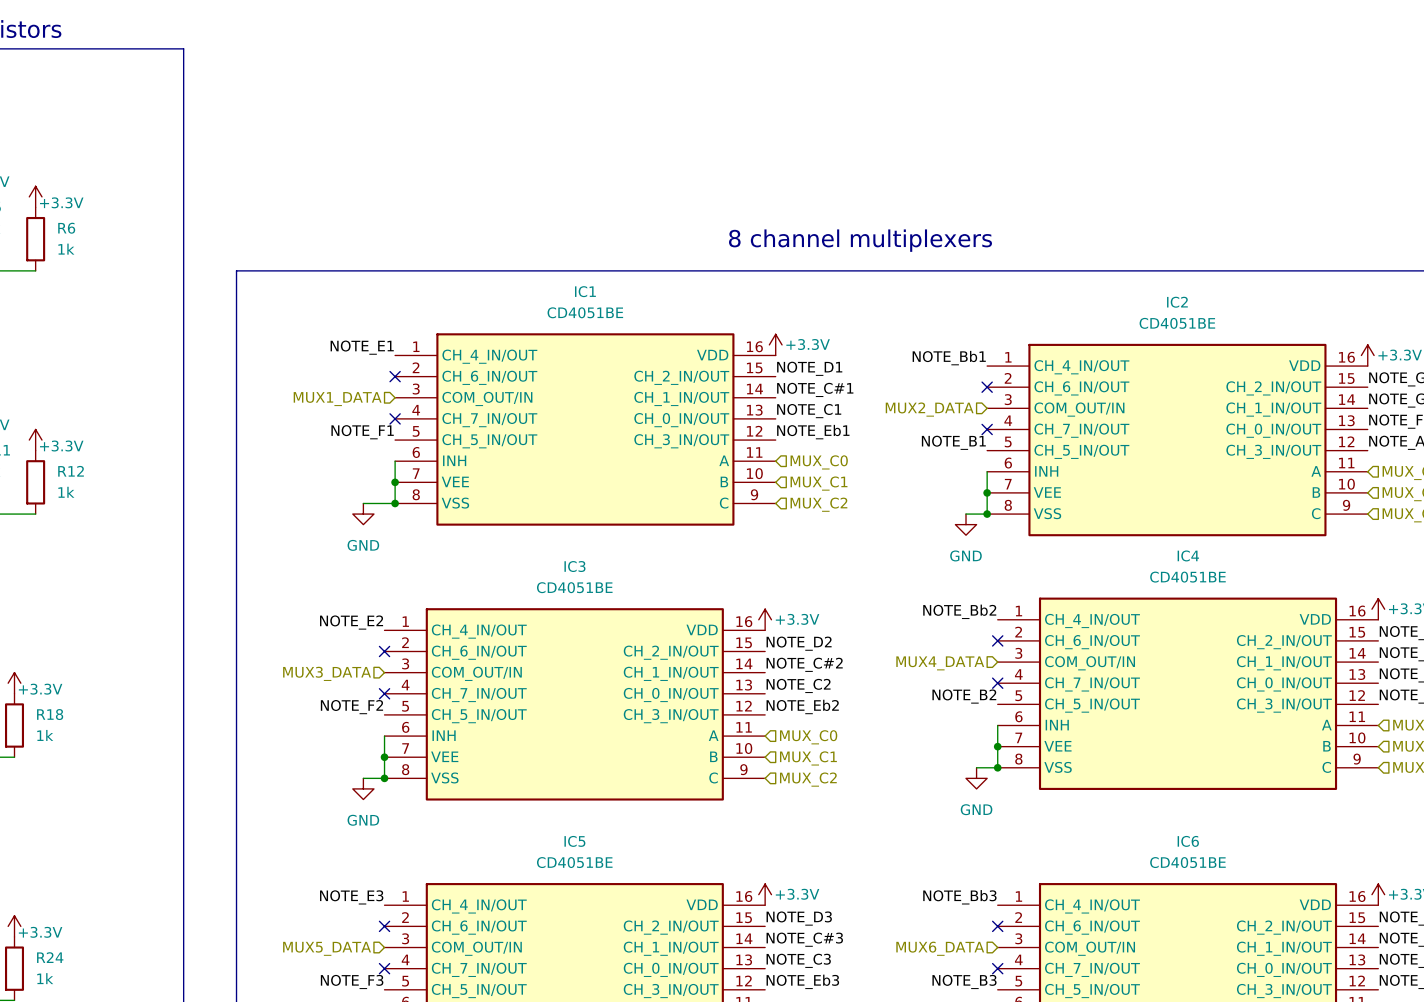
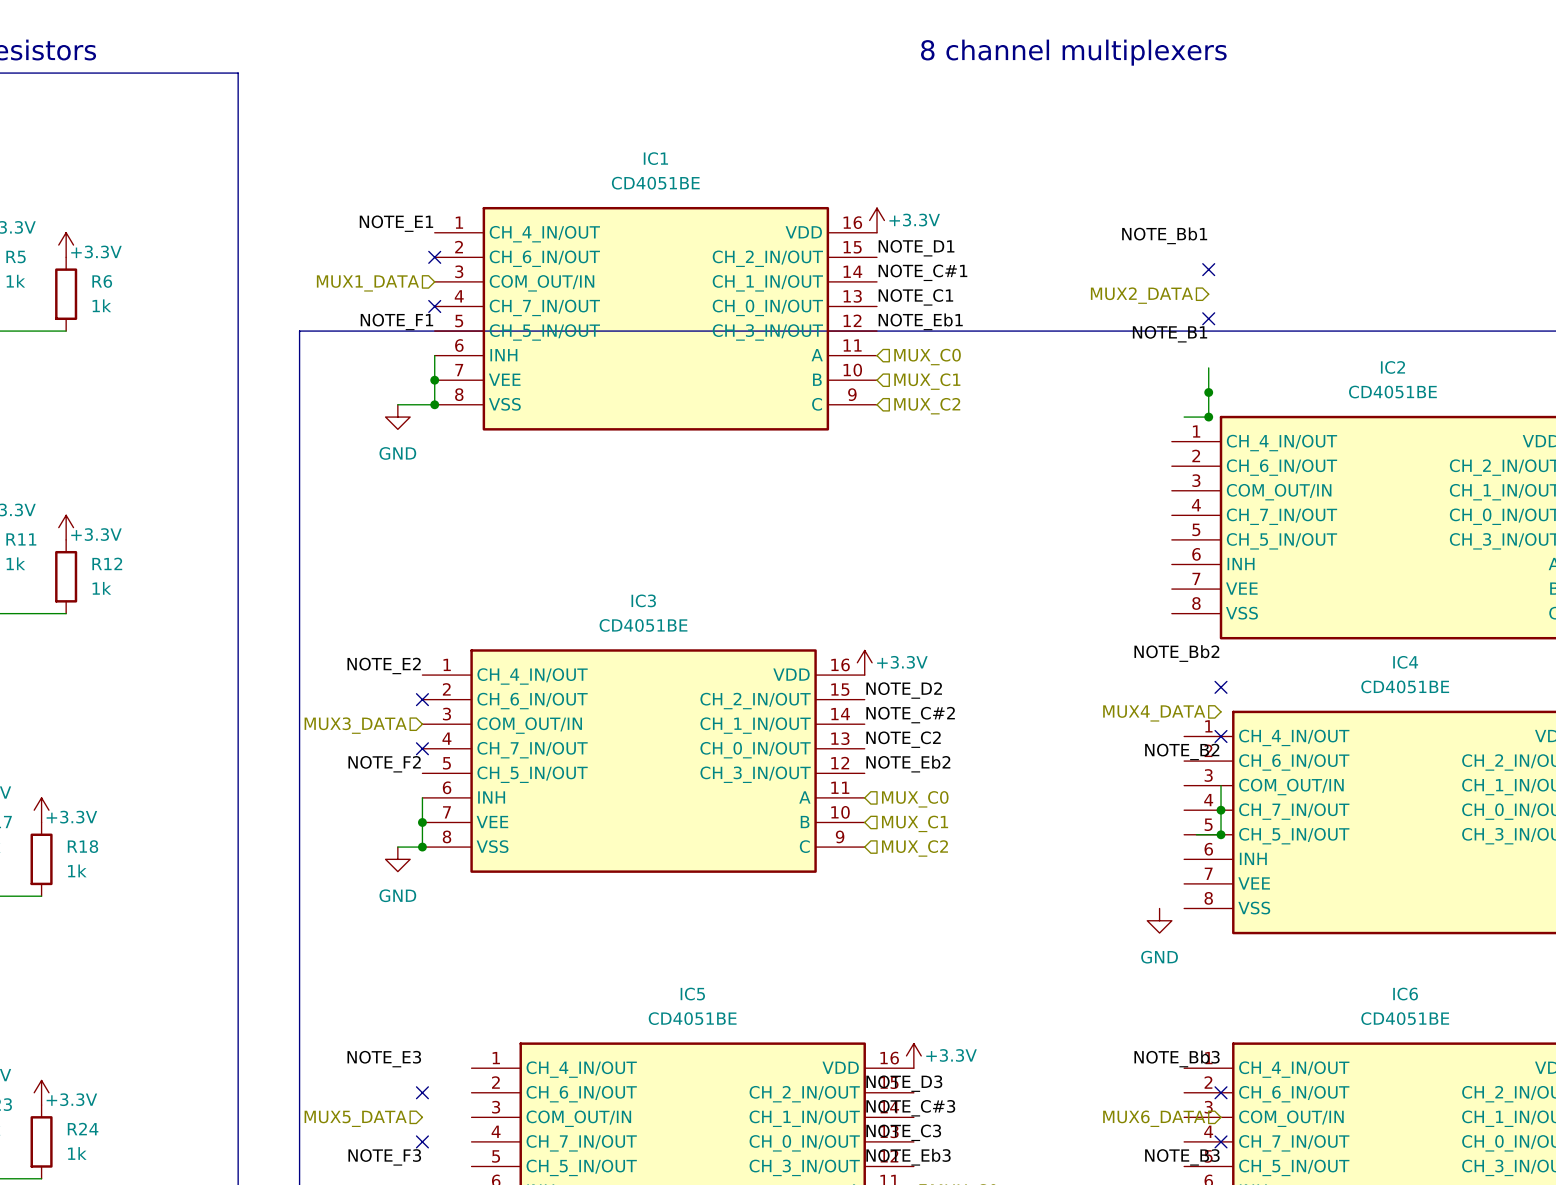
text: none -> 8 channel multiplexers (1073, 52)
power symbol: none -> +3.3V (877, 220)
no-connect mark: none -> (434, 257)
no-connect mark: none -> (1208, 269)
text: 8 channel multiplexers (860, 240) -> none
no-connect mark: none -> (434, 306)
no-connect mark: none -> (1208, 318)
hierarchical label: none -> MUX_C0 (927, 357)
junction: none -> (434, 380)
hierarchical label: none -> MUX_C1 (927, 381)
junction: none -> (1208, 392)
junction: none -> (434, 404)
hierarchical label: none -> MUX_C2 (927, 406)
power symbol: none -> GND (397, 417)
power symbol: +3.3V (775, 344) -> none
junction: none -> (1208, 417)
label position: NOTE_E1 (362, 347) -> NOTE_E1 (396, 223)
label position: NOTE_Bb1 (949, 358) -> NOTE_Bb1 (1164, 235)
label position: NOTE_D1 (809, 368) -> NOTE_D1 (916, 248)
no-connect mark: (395, 376) -> none
no-connect mark: (987, 387) -> none
label position: NOTE_C#1 (815, 389) -> NOTE_C#1 (922, 272)
hierarchical label position: MUX1_DATA (337, 399) -> MUX1_DATA (367, 283)
hierarchical label position: MUX2_DATA (929, 409) -> MUX2_DATA (1141, 295)
label position: NOTE_C1 (809, 411) -> NOTE_C1 (915, 297)
no-connect mark: (395, 418) -> none
IC1 position: (585, 429) -> (655, 318)
no-connect mark: (987, 429) -> none
label position: NOTE_F1 (362, 432) -> NOTE_F1 (396, 321)
label position: NOTE_Eb1 (813, 432) -> NOTE_Eb1 (920, 321)
label position: NOTE_B1 (953, 442) -> NOTE_B1 (1170, 334)
wire: (395, 461) (395, 503) (363, 503) -> (434, 355) (434, 404) (397, 404)
hierarchical label: MUX_C0 (819, 462) -> none
wire: (987, 471) (987, 514) (966, 514) -> (1208, 367) (1208, 417) (1184, 417)
junction: (395, 482) -> none
hierarchical label: MUX_C1 (819, 483) -> none
junction: (987, 492) -> none
junction: (395, 503) -> none
hierarchical label: MUX_C2 (818, 504) -> none
power symbol: GND (363, 514) -> none
junction: (987, 514) -> none
power symbol: GND (966, 524) -> none
no-connect mark: none -> (1221, 687)
no-connect mark: none -> (422, 699)
label position: NOTE_Bb2 (959, 611) -> NOTE_Bb2 (1176, 653)
power symbol position: +3.3V (765, 619) -> +3.3V (864, 662)
no-connect mark: none -> (1221, 736)
label position: NOTE_E2 (351, 622) -> NOTE_E2 (384, 665)
no-connect mark: none -> (422, 748)
no-connect mark: (997, 640) -> none
label position: NOTE_D2 (799, 643) -> NOTE_D2 (904, 690)
no-connect mark: (384, 651) -> none
hierarchical label position: MUX4_DATA (940, 663) -> MUX4_DATA (1154, 713)
label position: NOTE_C#2 (804, 664) -> NOTE_C#2 (910, 715)
hierarchical label position: MUX3_DATA (327, 673) -> MUX3_DATA (355, 725)
no-connect mark: (997, 683) -> none
junction: none -> (1221, 810)
label position: NOTE_C2 (798, 685) -> NOTE_C2 (903, 739)
junction: none -> (422, 822)
no-connect mark: (384, 693) -> none
label position: NOTE_B2 (964, 696) -> NOTE_B2 (1182, 751)
IC3 position: (574, 704) -> (643, 761)
junction: none -> (1221, 834)
label position: NOTE_Eb2 (802, 706) -> NOTE_Eb2 (908, 764)
label position: NOTE_F2 (351, 707) -> NOTE_F2 (384, 764)
junction: none -> (422, 847)
wire: (997, 725) (997, 767) (976, 767) -> (1221, 785) (1221, 834) (1196, 834)
wire: (384, 736) (384, 778) (363, 778) -> (422, 797) (422, 847) (397, 847)
hierarchical label position: MUX_C0 (808, 737) -> MUX_C0 (915, 799)
junction: (997, 746) -> none
junction: (384, 757) -> none
hierarchical label position: MUX_C1 (808, 758) -> MUX_C1 (915, 823)
junction: (997, 767) -> none
junction: (384, 778) -> none
hierarchical label position: MUX_C2 (808, 779) -> MUX_C2 (914, 848)
power symbol position: GND (363, 788) -> GND (397, 859)
label position: NOTE_E3 (351, 897) -> NOTE_E3 (384, 1059)
label position: NOTE_Bb3 (959, 897) -> NOTE_Bb3 (1177, 1058)
label position: NOTE_D3 (799, 918) -> NOTE_D3 (904, 1083)
no-connect mark: none -> (422, 1092)
no-connect mark: (384, 926) -> none
no-connect mark: (997, 926) -> none
no-connect mark: none -> (1221, 1092)
label position: NOTE_C#3 (804, 939) -> NOTE_C#3 (910, 1108)
hierarchical label position: MUX5_DATA (327, 948) -> MUX5_DATA (355, 1118)
hierarchical label position: MUX6_DATA (940, 948) -> MUX6_DATA (1154, 1118)
label position: NOTE_C3 (798, 960) -> NOTE_C3 (903, 1132)
no-connect mark: none -> (422, 1141)
no-connect mark: (384, 968) -> none
no-connect mark: (997, 968) -> none
no-connect mark: none -> (1221, 1141)
label position: NOTE_F3 (352, 981) -> NOTE_F3 (384, 1157)
label position: NOTE_Eb3 (802, 981) -> NOTE_Eb3 (908, 1157)
label position: NOTE_B3 (964, 981) -> NOTE_B3 (1182, 1157)

